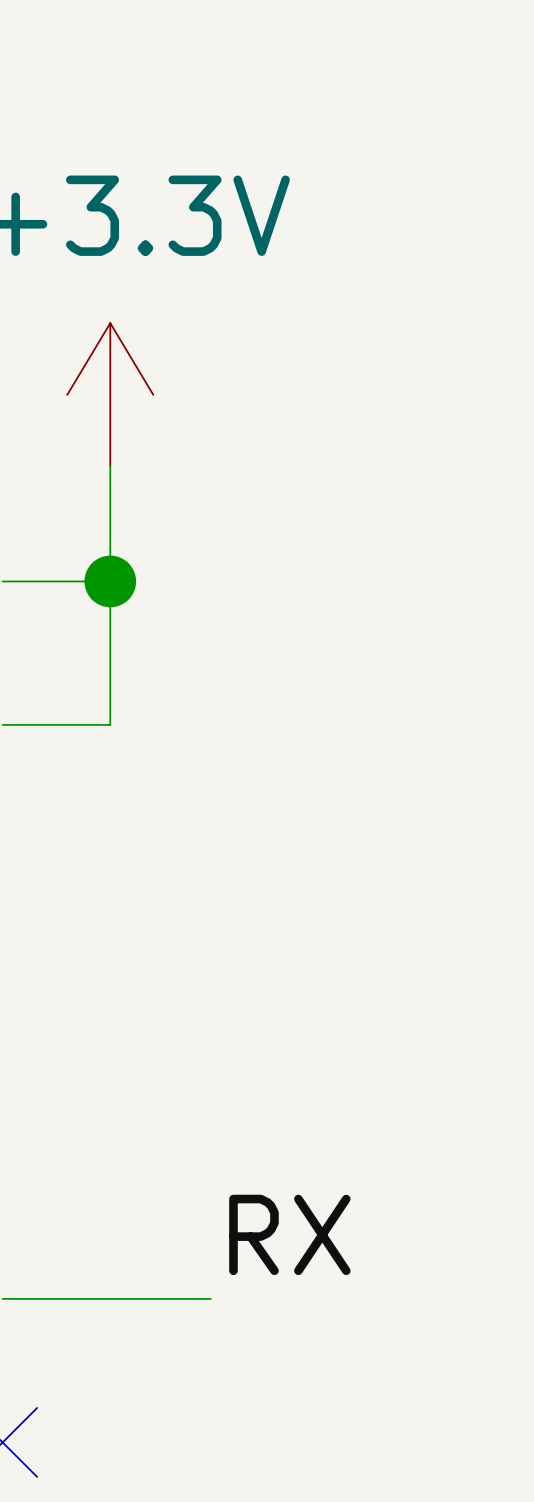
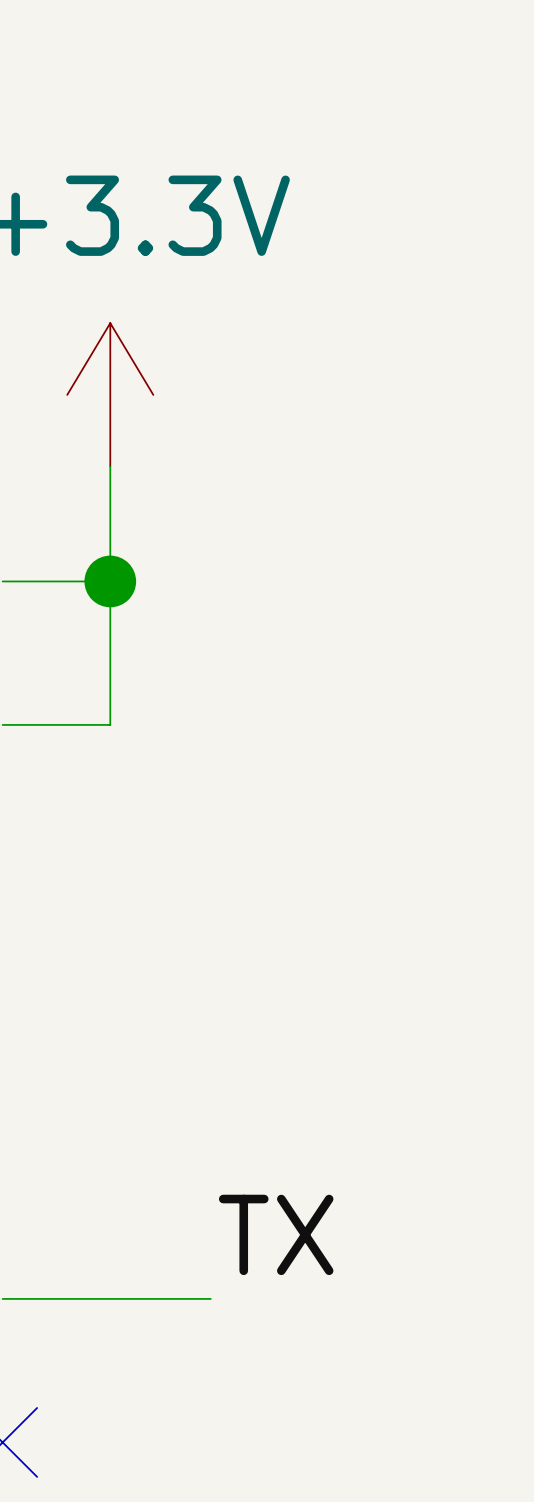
label: RX (289, 1234) -> TX (276, 1234)

